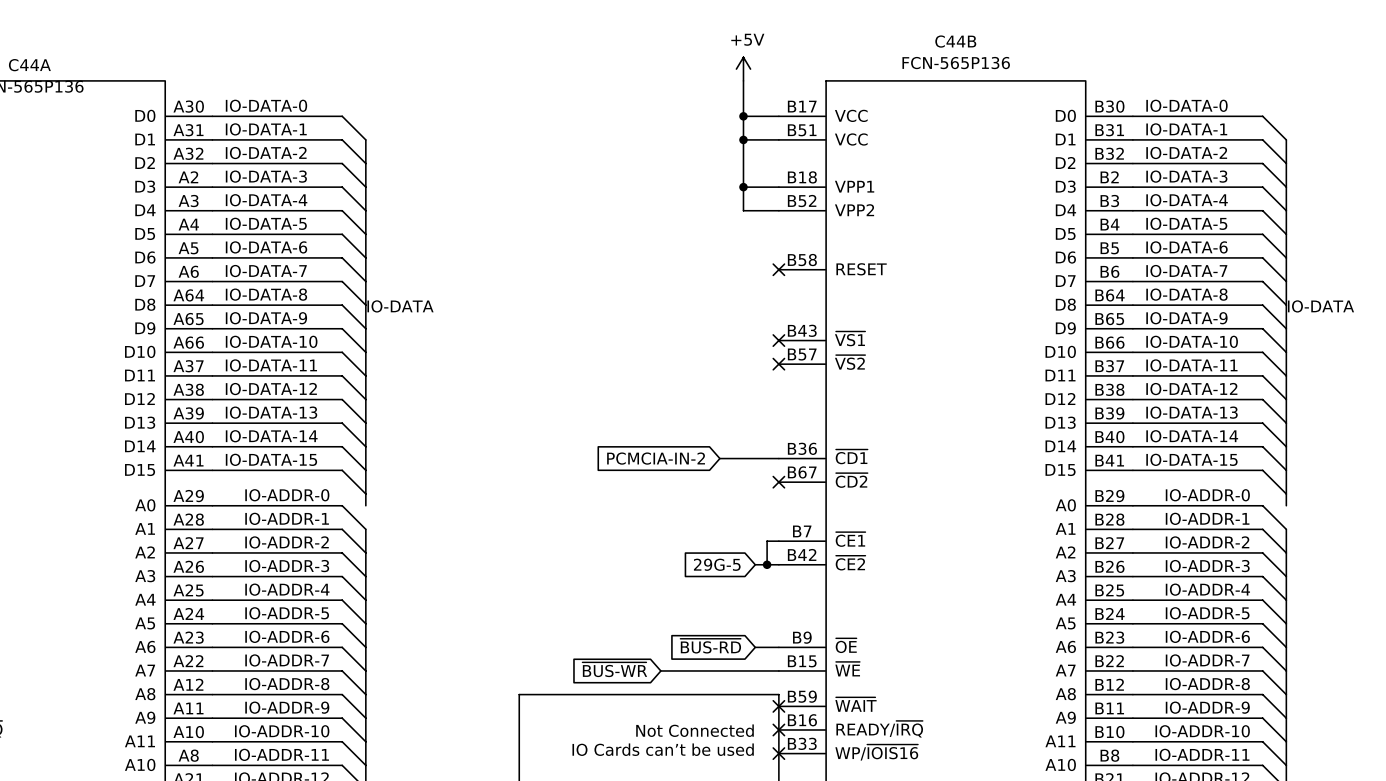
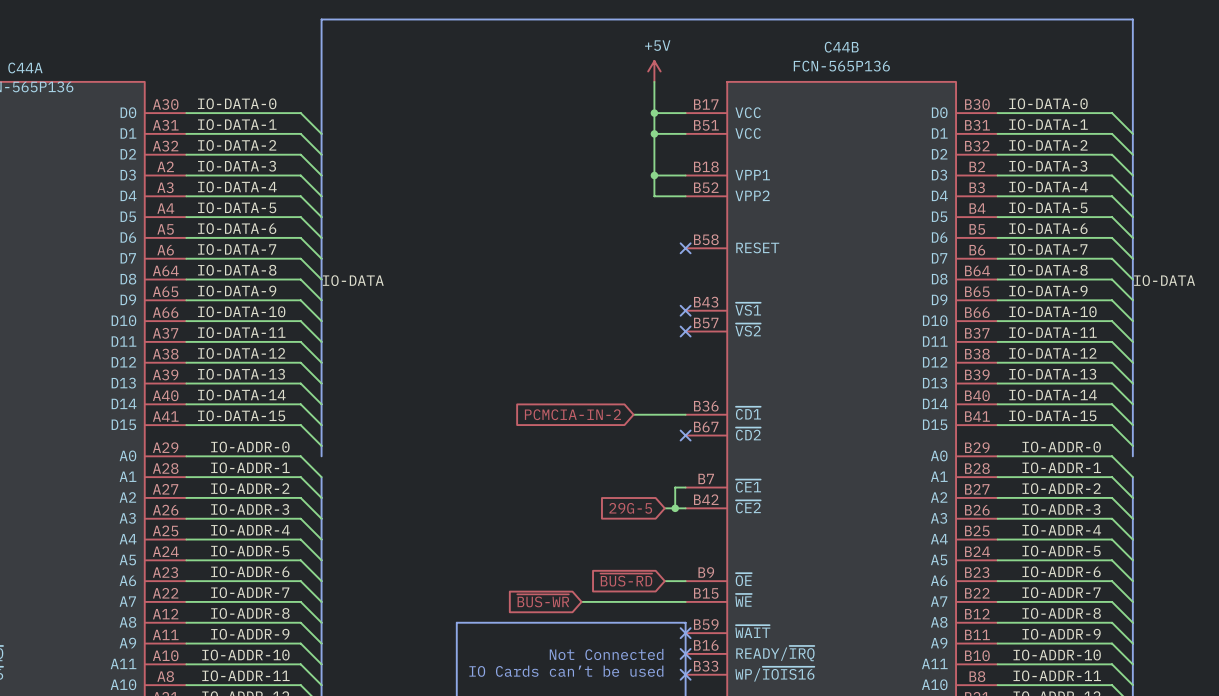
bus: none -> (321, 133) (321, 19) (1132, 19) (1132, 133)

